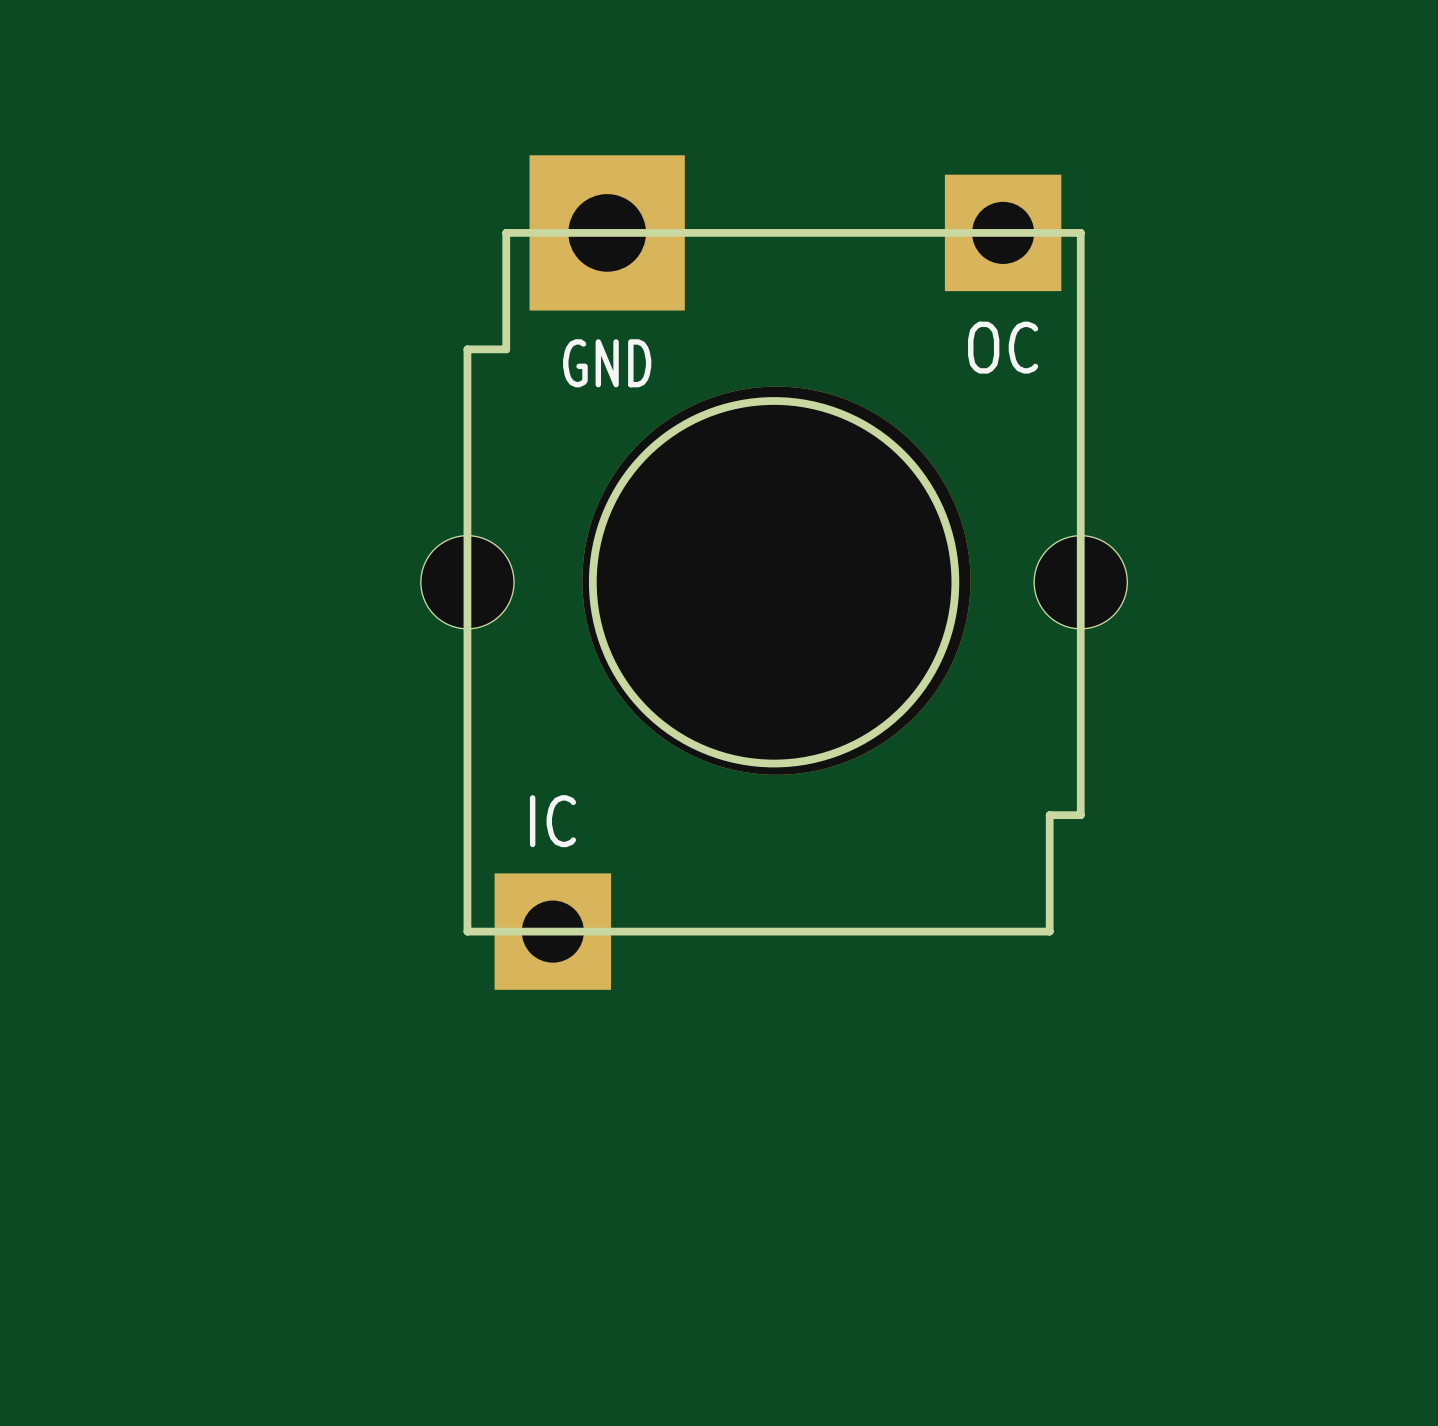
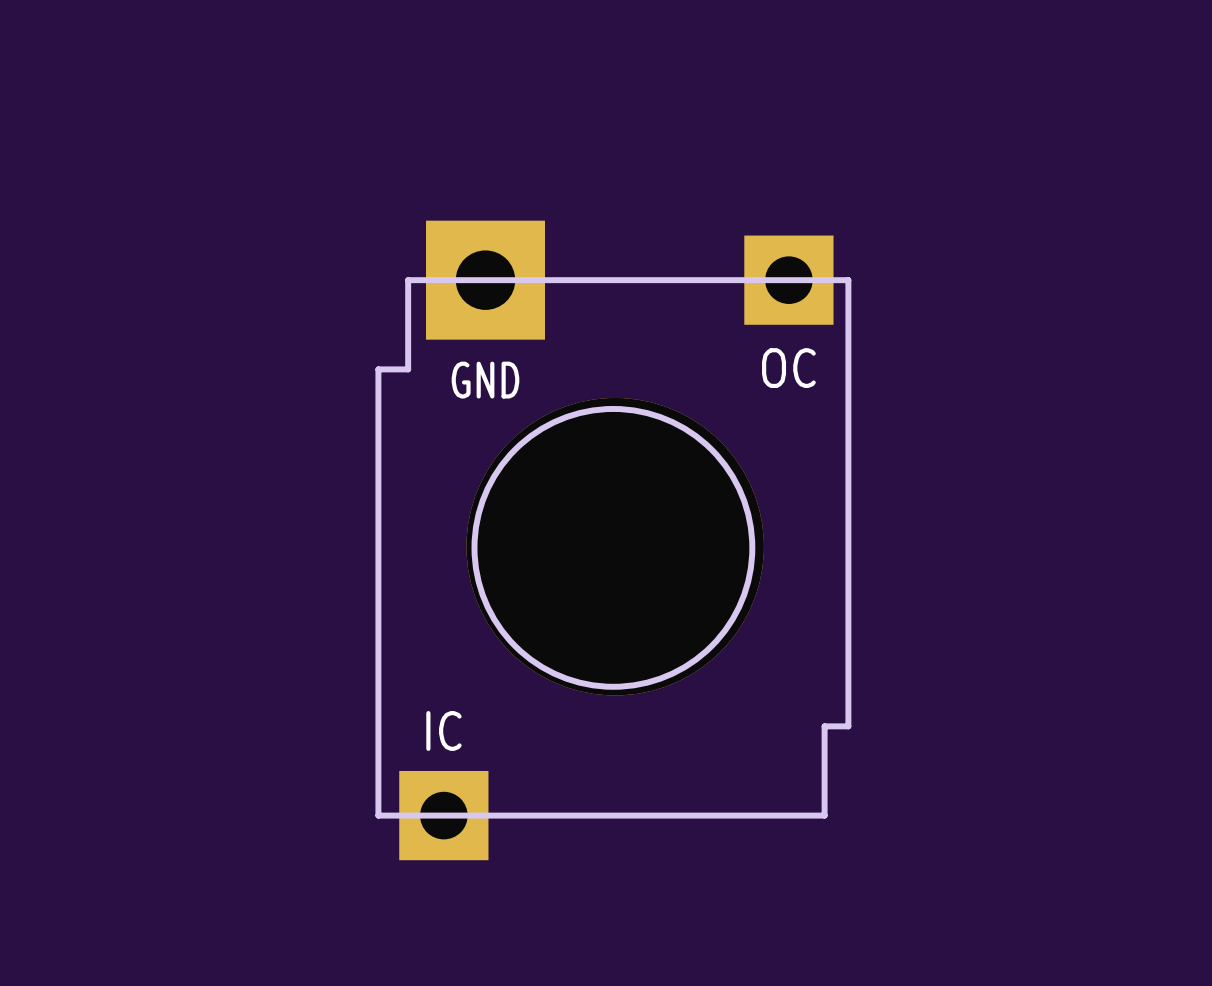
part: (467, 582) -> none
part: (1080, 582) -> none

